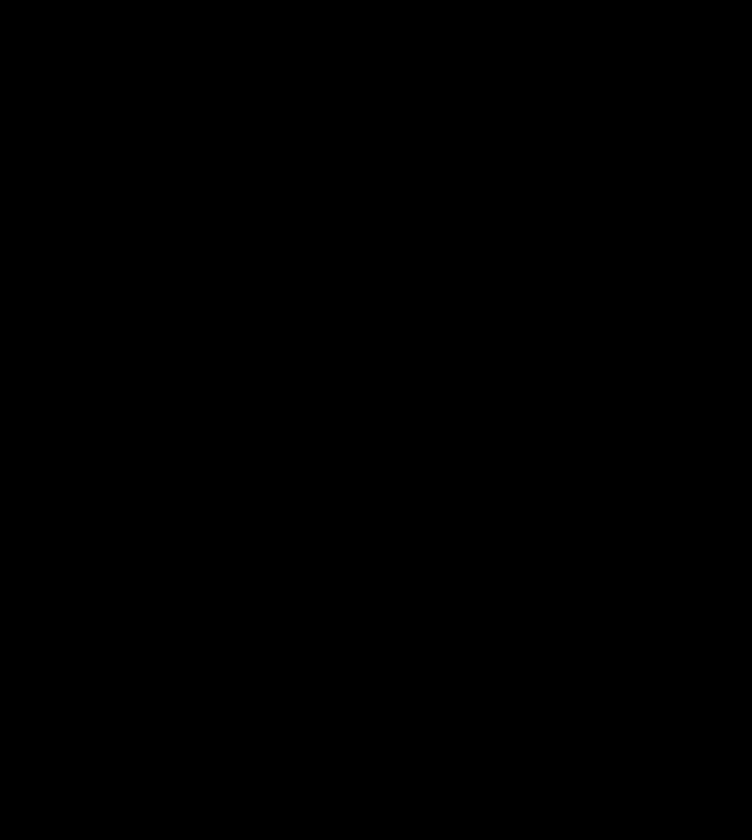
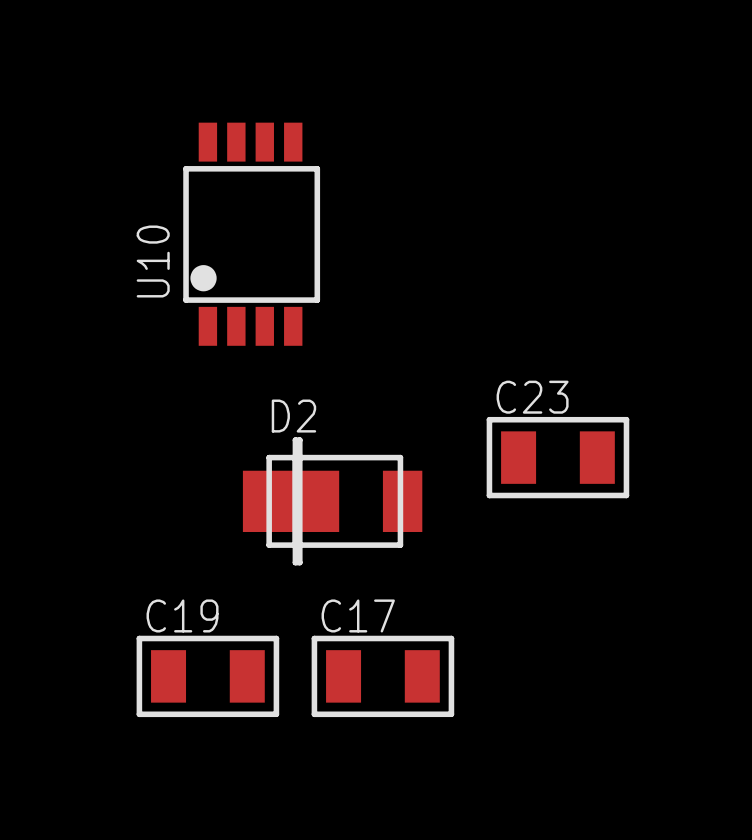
U10: none -> (251, 234)
C23: none -> (557, 457)
D2: none -> (332, 501)
C19: none -> (207, 676)
C17: none -> (382, 676)

